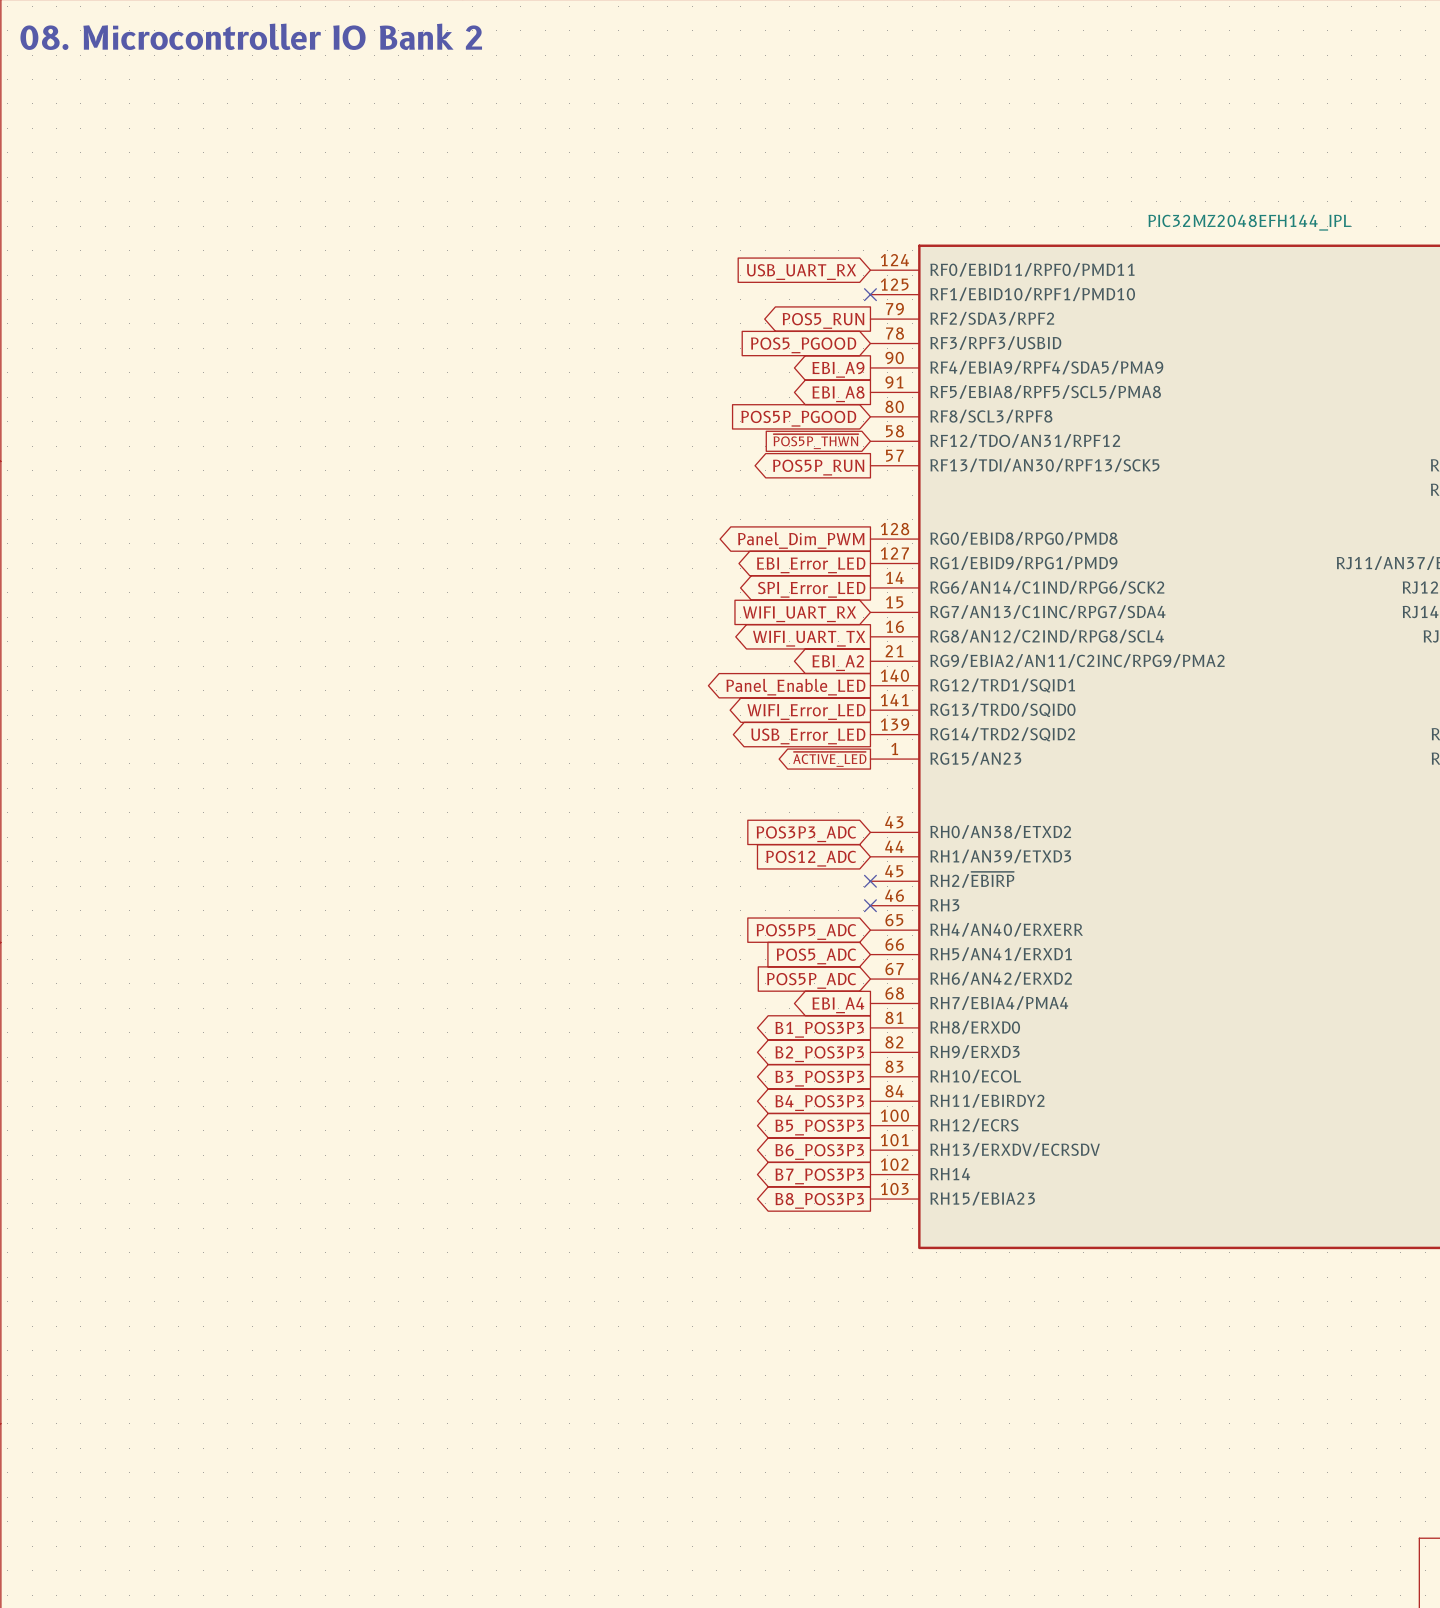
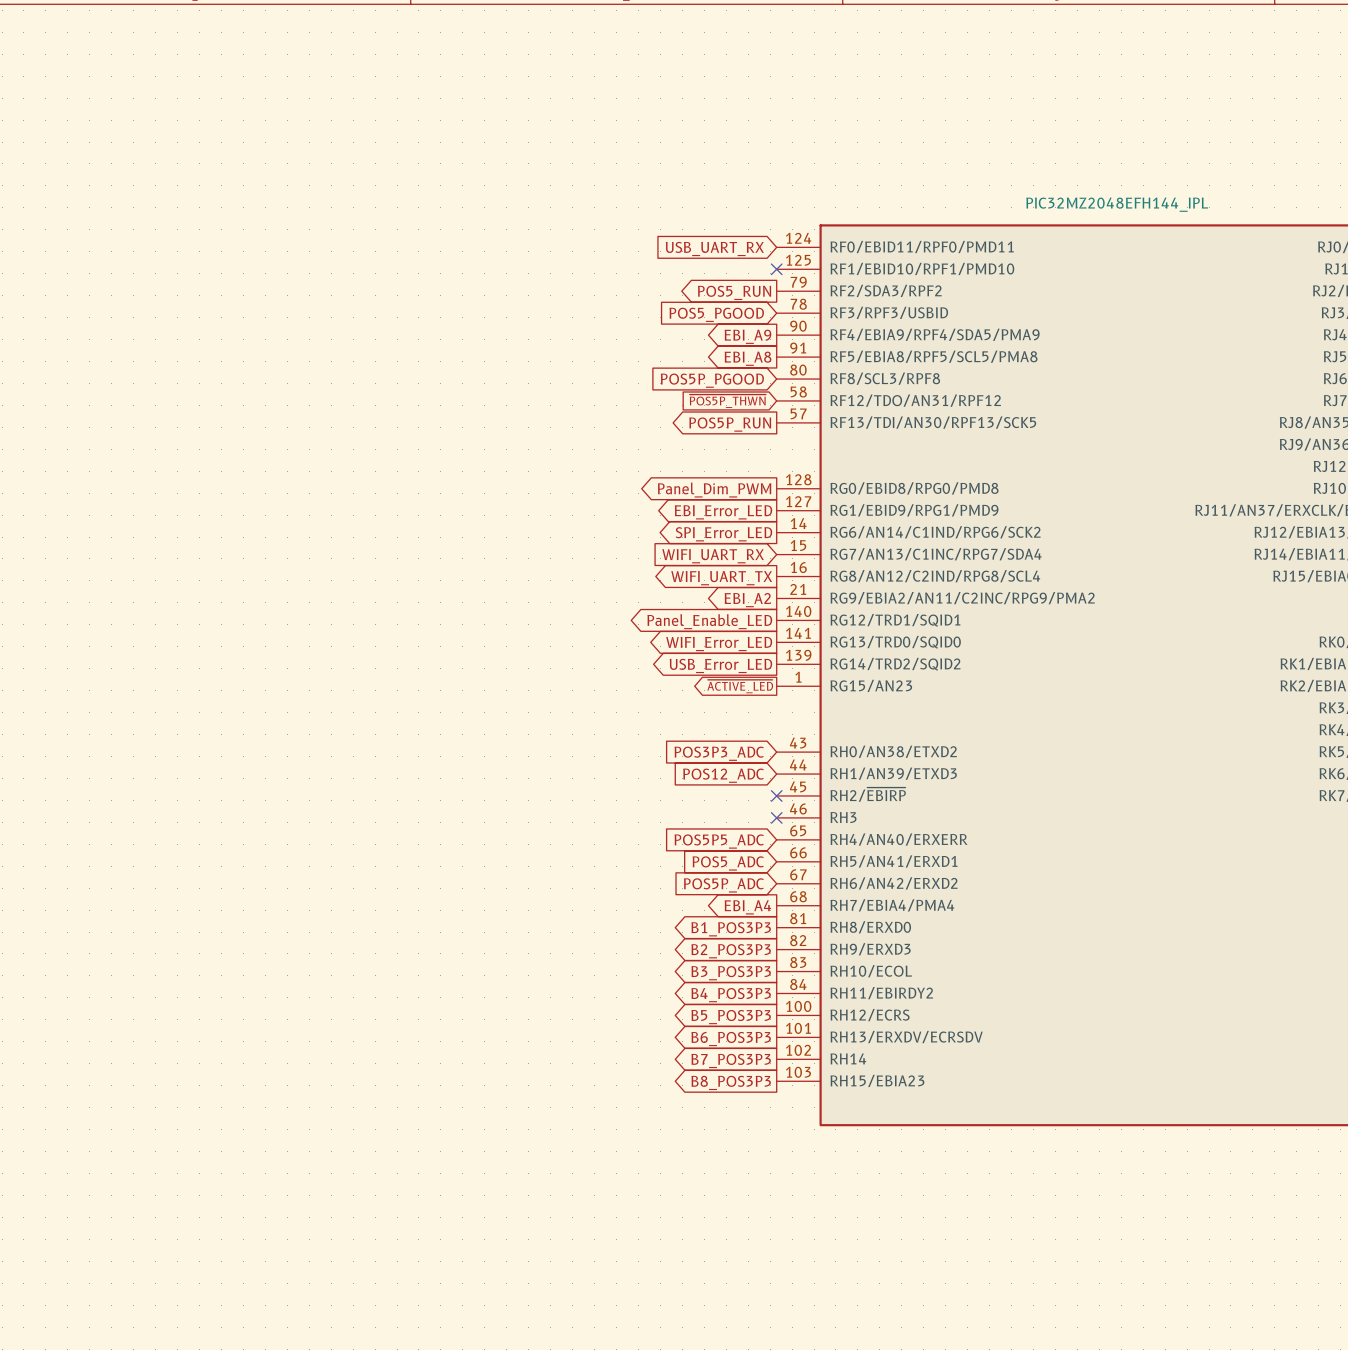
text: 08. Microcontroller IO Bank 2 (251, 36) -> none

